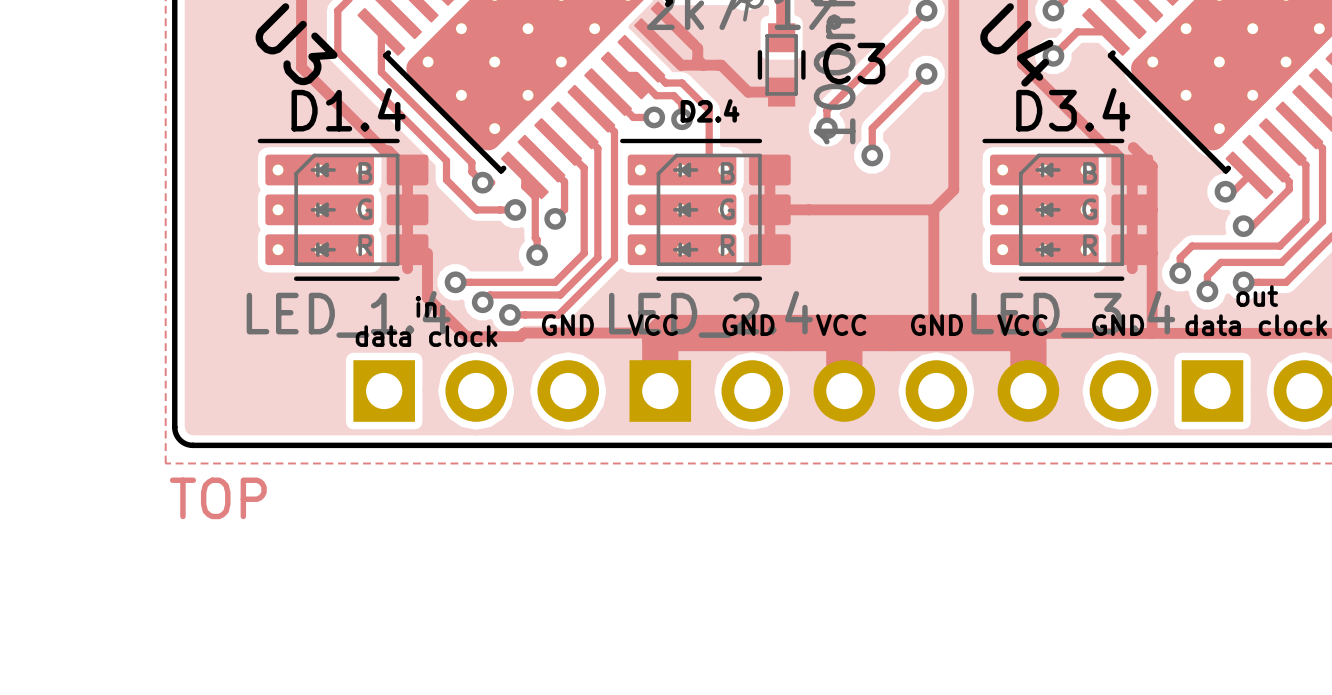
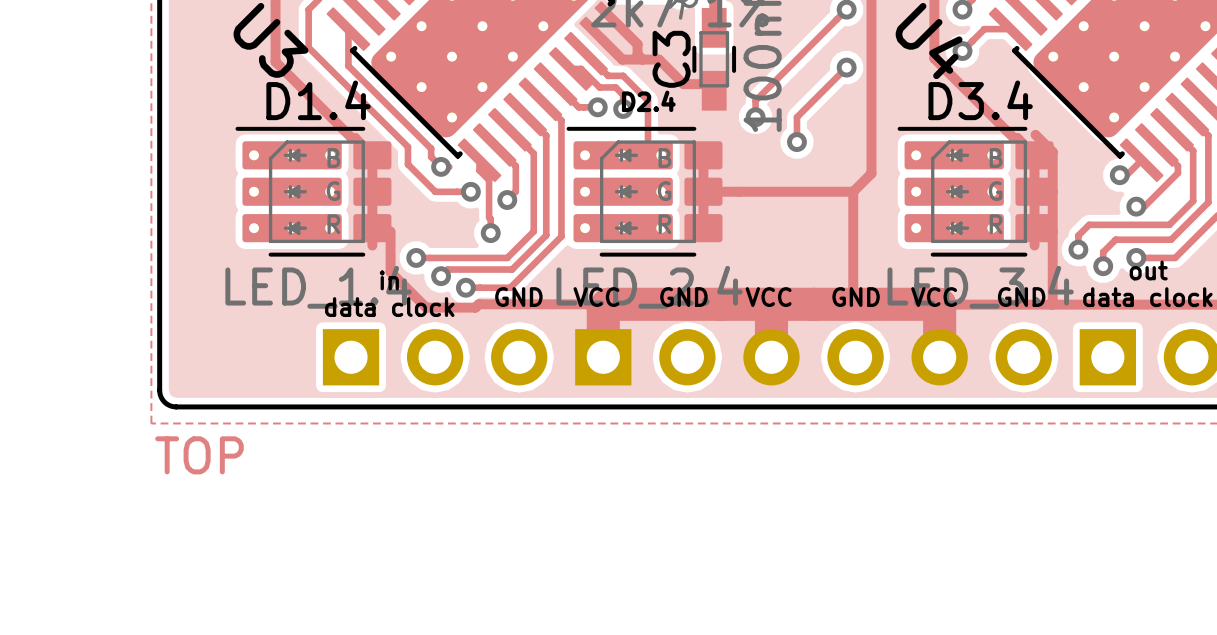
C3 footprint: [757, 23, 806, 107] -> [692, 7, 737, 111]
C3 name rotation: 0° (854, 63) -> 90° counterclockwise (671, 59)
C3 name position: C3 (854, 63) -> C3 (671, 59)

